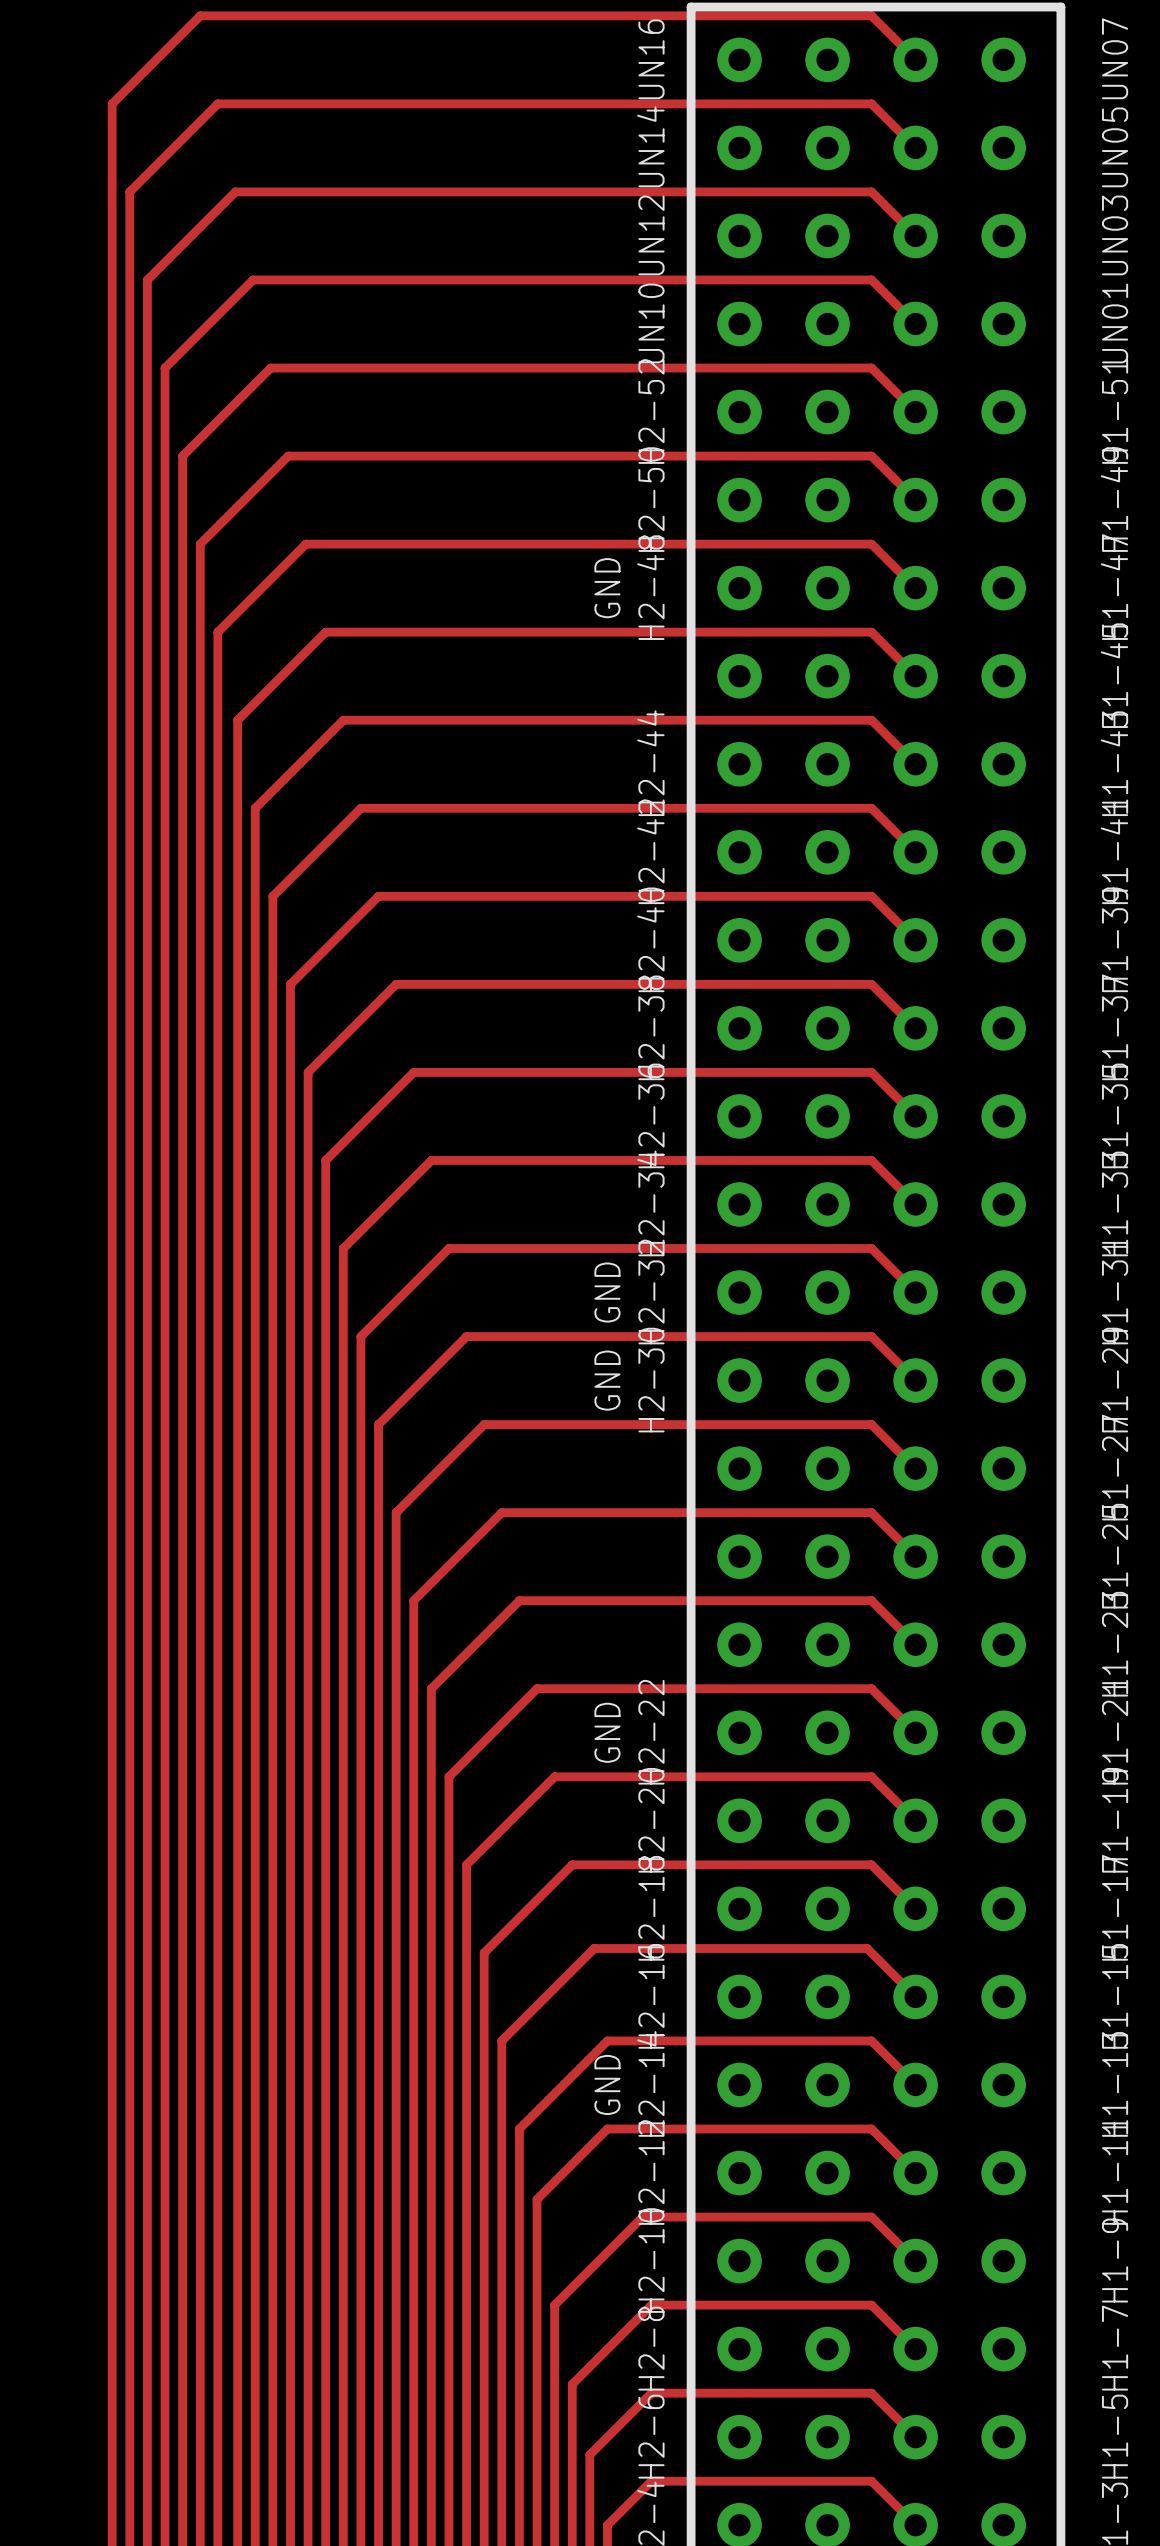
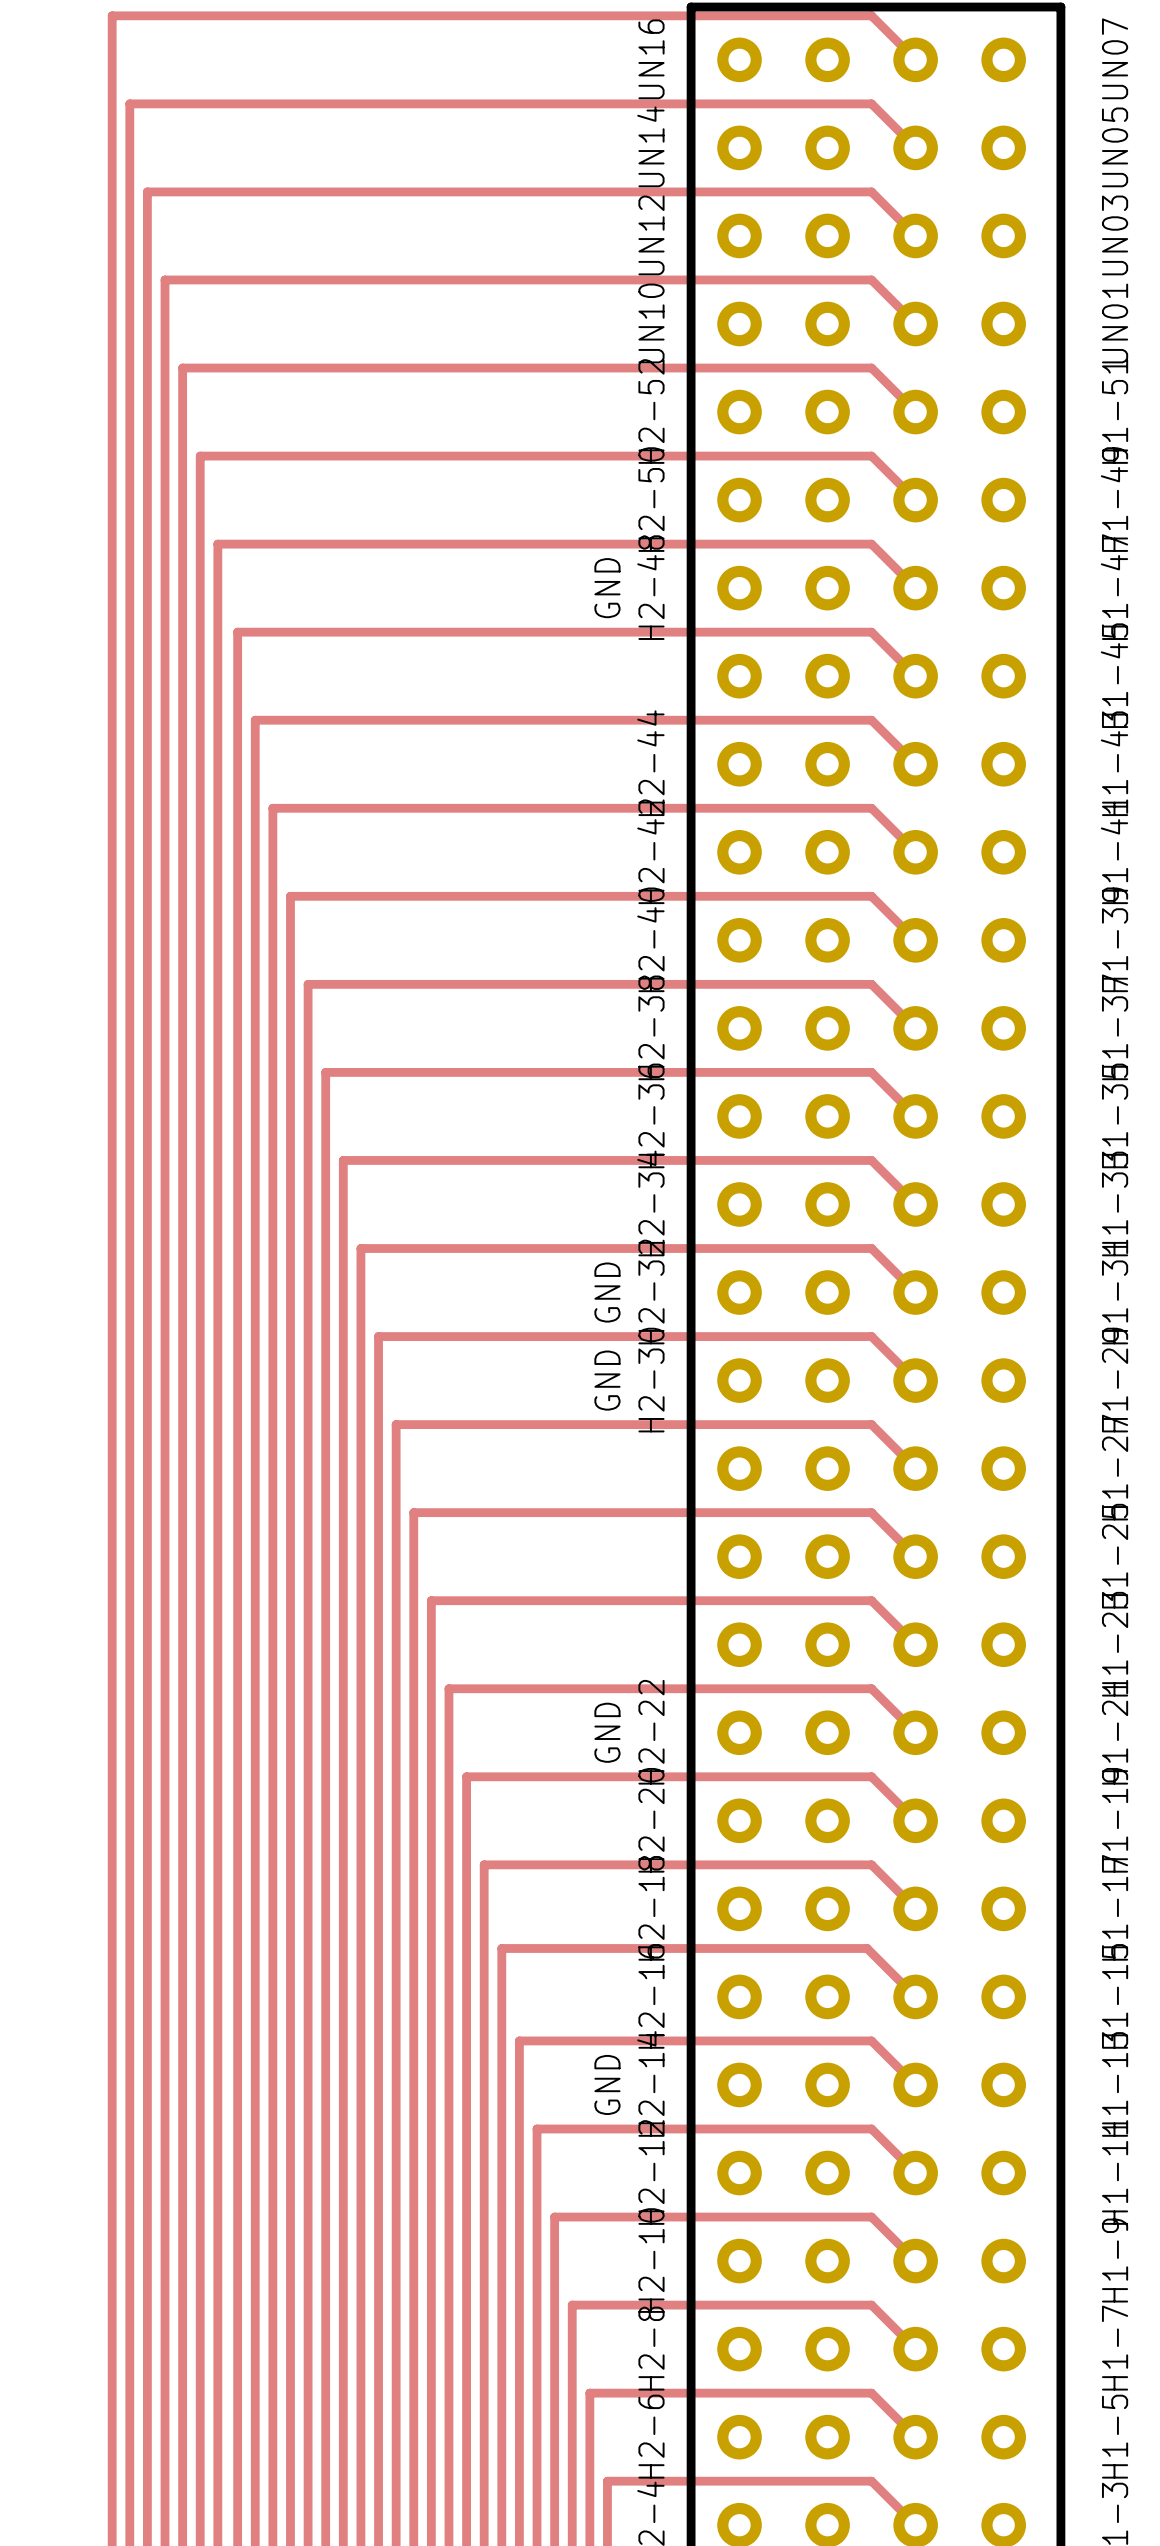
track: (200, 15) (112, 103) -> (200, 15) (112, 15) (112, 103)
track: (217, 103) (129, 191) -> (217, 103) (129, 103) (129, 191)
track: (235, 191) (147, 279) -> (235, 191) (147, 191) (147, 279)
track: (253, 279) (165, 368) -> (253, 279) (165, 279) (165, 368)
track: (270, 368) (182, 456) -> (270, 368) (182, 368) (182, 456)
track: (288, 456) (200, 544) -> (288, 456) (200, 456) (200, 544)
track: (305, 544) (217, 632) -> (305, 544) (217, 544) (217, 632)
track: (325, 632) (237, 720) -> (325, 632) (237, 632) (237, 720)
track: (343, 720) (255, 808) -> (343, 720) (255, 720) (255, 808)
track: (360, 808) (272, 896) -> (360, 808) (272, 808) (272, 896)
track: (378, 896) (290, 984) -> (378, 896) (290, 896) (290, 984)
track: (396, 984) (308, 1072) -> (396, 984) (308, 984) (308, 1072)
track: (413, 1072) (325, 1160) -> (413, 1072) (325, 1072) (325, 1160)
track: (431, 1160) (343, 1248) -> (431, 1160) (343, 1160) (343, 1248)
track: (448, 1248) (360, 1336) -> (448, 1248) (360, 1248) (360, 1336)
track: (466, 1336) (378, 1424) -> (466, 1336) (378, 1336) (378, 1424)
track: (484, 1424) (396, 1512) -> (484, 1424) (396, 1424) (396, 1512)
track: (501, 1512) (413, 1600) -> (501, 1512) (413, 1512) (413, 1600)
track: (519, 1600) (431, 1688) -> (519, 1600) (431, 1600) (431, 1688)
track: (537, 1688) (448, 1776) -> (537, 1688) (448, 1688) (448, 1776)
track: (554, 1776) (466, 1864) -> (554, 1776) (466, 1776) (466, 1864)
track: (572, 1864) (484, 1952) -> (572, 1864) (484, 1864) (484, 1952)
track: (594, 1948) (501, 2040) -> (594, 1948) (501, 1948) (501, 2040)
track: (607, 2040) (519, 2128) -> (607, 2040) (519, 2040) (519, 2128)
track: (607, 2128) (537, 2199) -> (607, 2128) (537, 2128) (537, 2199)
track: (642, 2217) (554, 2305) -> (642, 2217) (554, 2217) (554, 2305)
track: (651, 2305) (572, 2384) -> (651, 2305) (572, 2305) (572, 2384)
track: (651, 2393) (589, 2454) -> (651, 2393) (589, 2393) (589, 2454)
track: (651, 2481) (607, 2525) -> (651, 2481) (607, 2481) (607, 2525)

